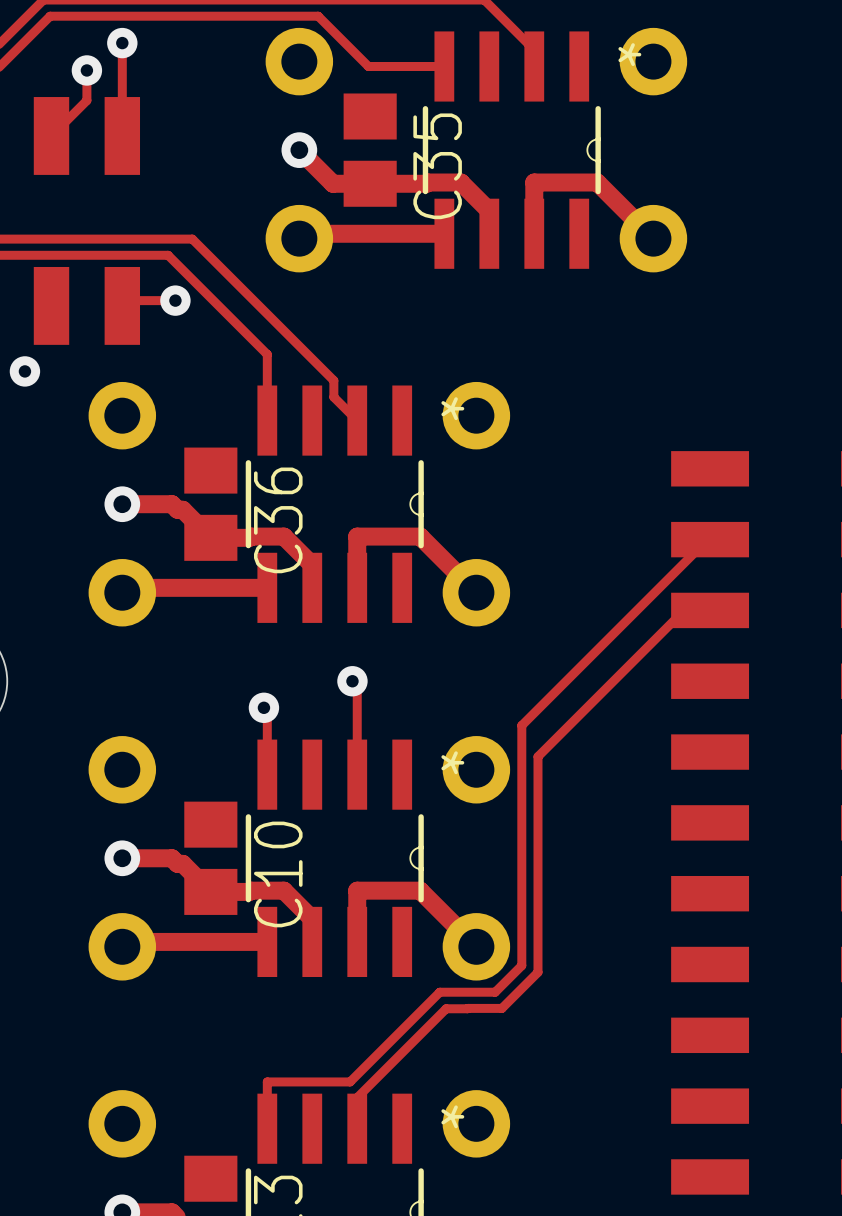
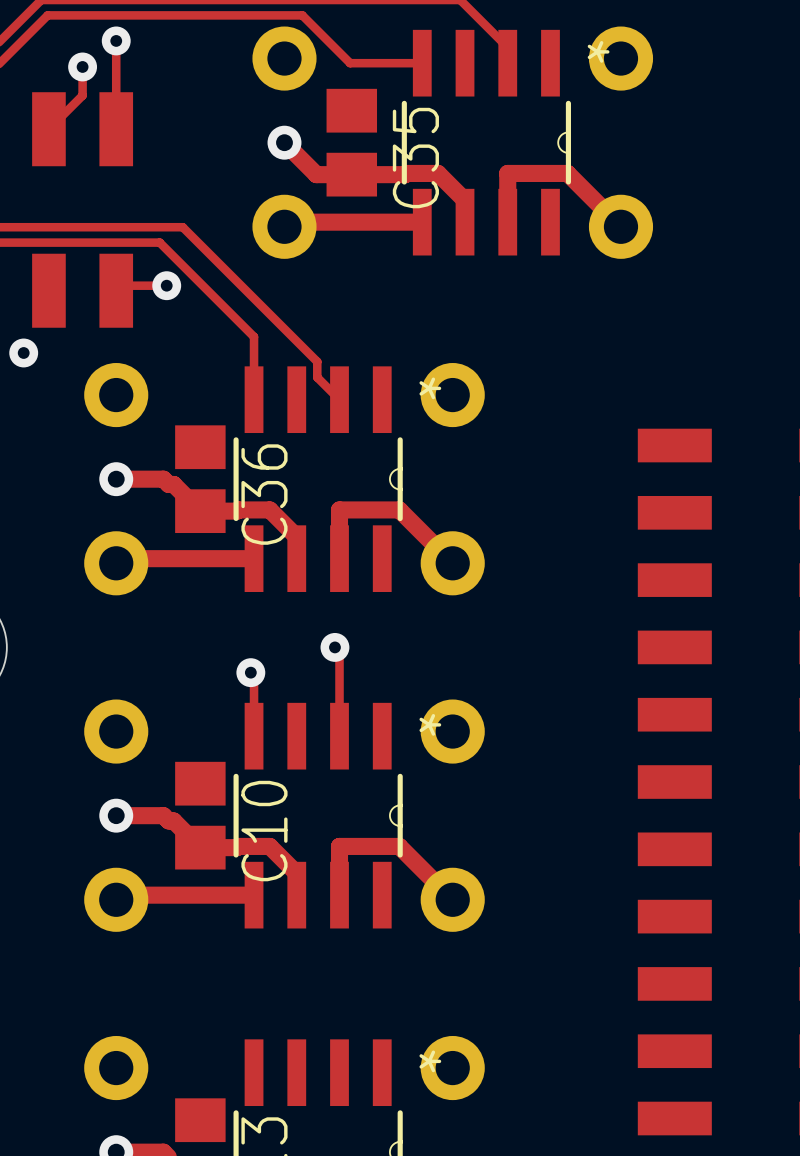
track: (710, 539) (707, 539) (521, 725) (521, 965) (495, 992) (439, 992) (350, 1081) (267, 1081) (267, 1128) -> none
track: (710, 610) (684, 610) (537, 756) (537, 972) (501, 1008) (467, 1008) -> none
track: (467, 1008) (446, 1008) (357, 1097) (357, 1128) -> none

